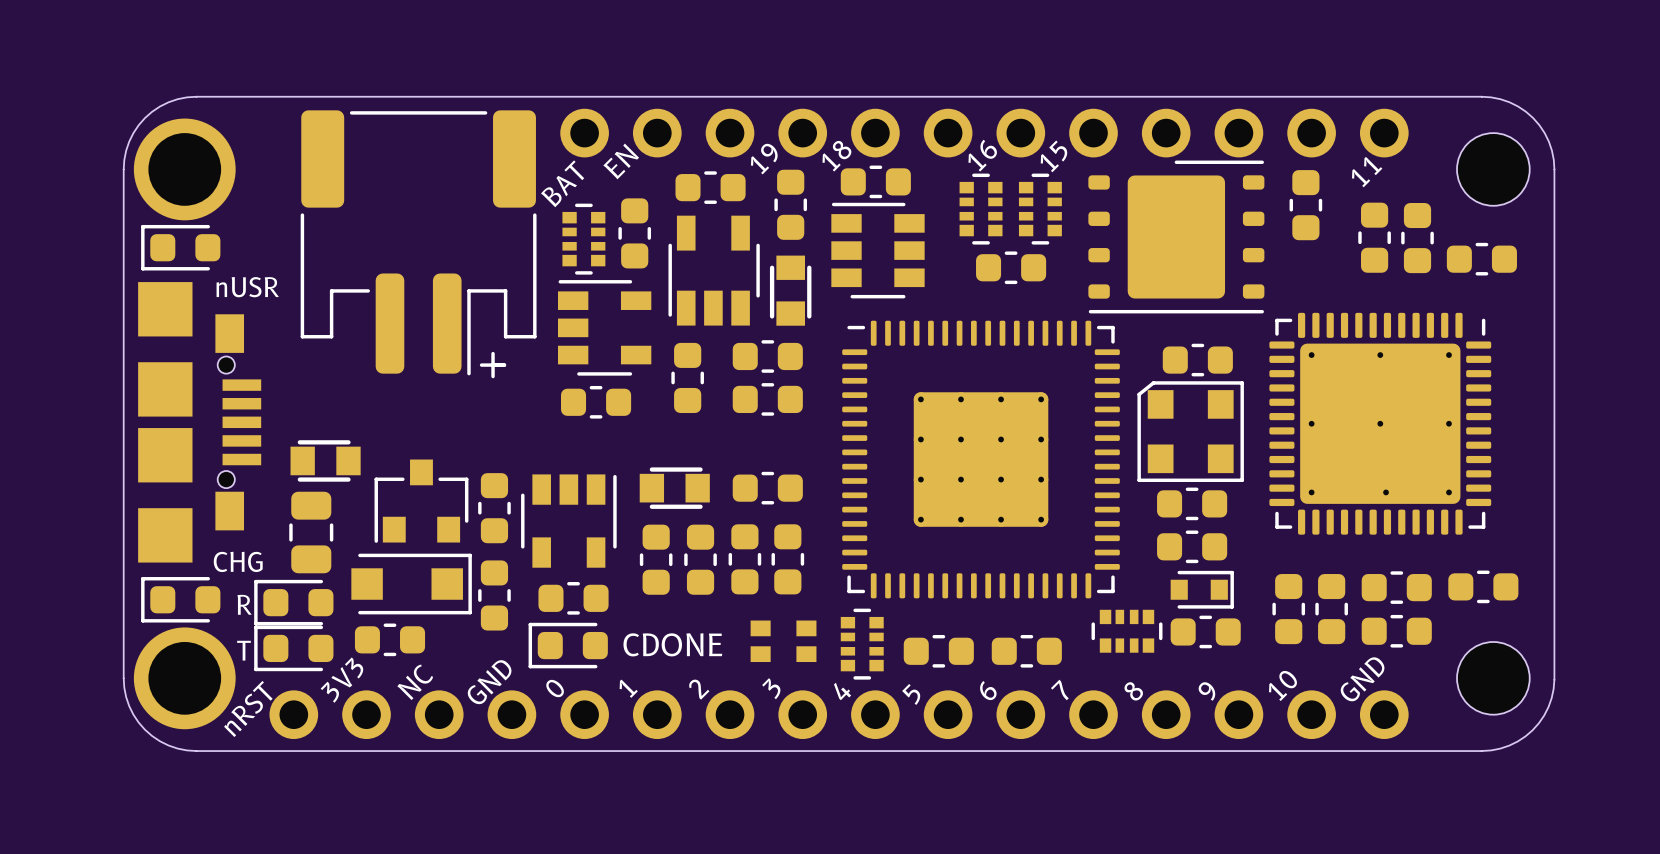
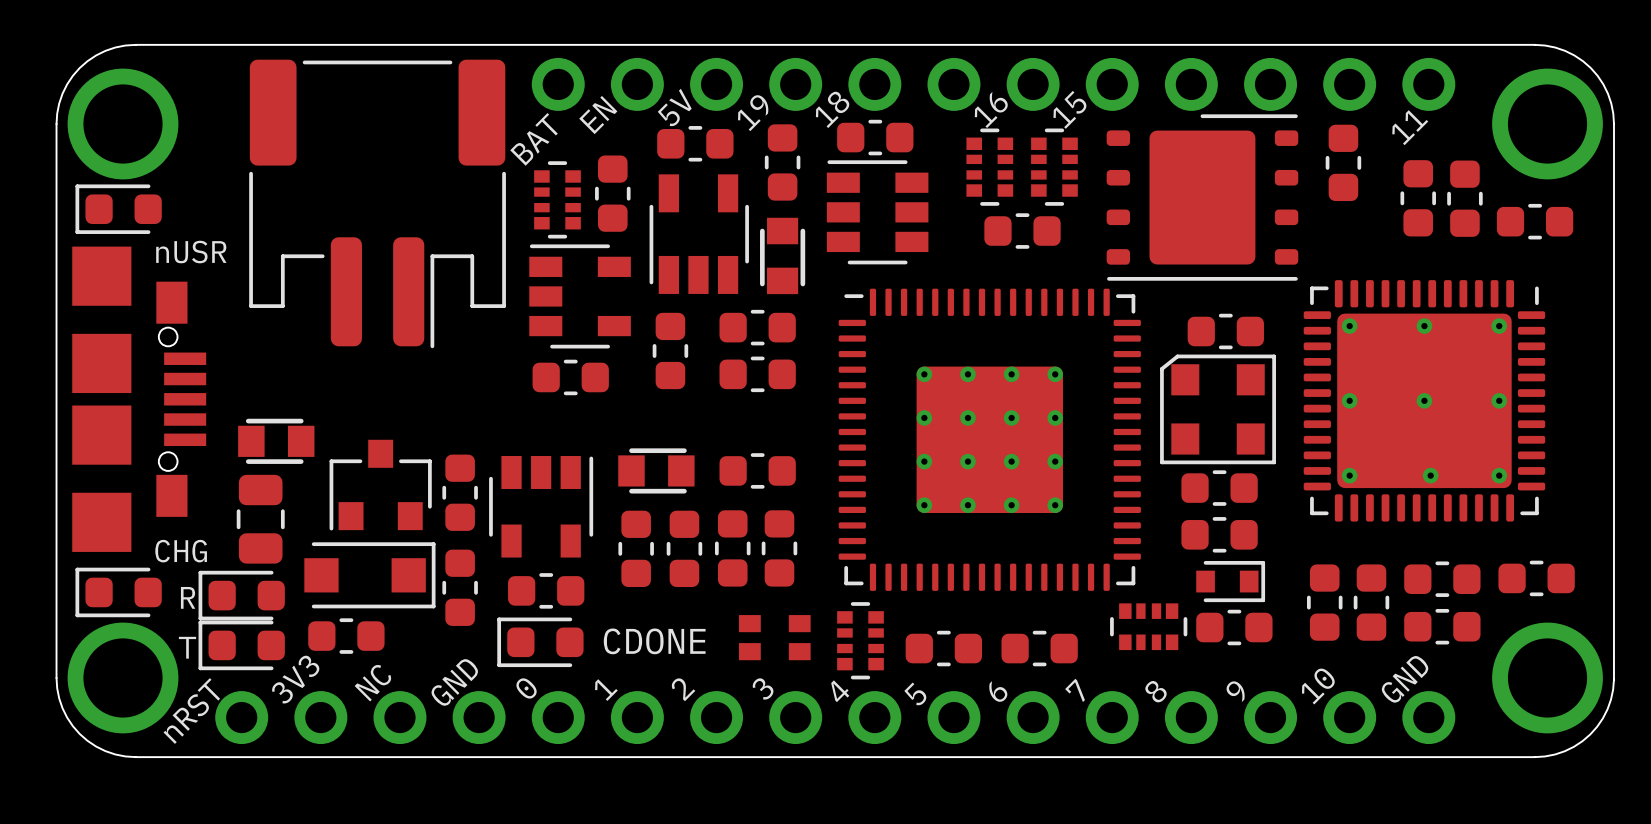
part footprint: [122, 96, 1556, 752] -> [55, 44, 1615, 758]
text: none -> 5V (674, 107)
line: (493, 353) (493, 376) -> none
line: (481, 365) (504, 365) -> none

